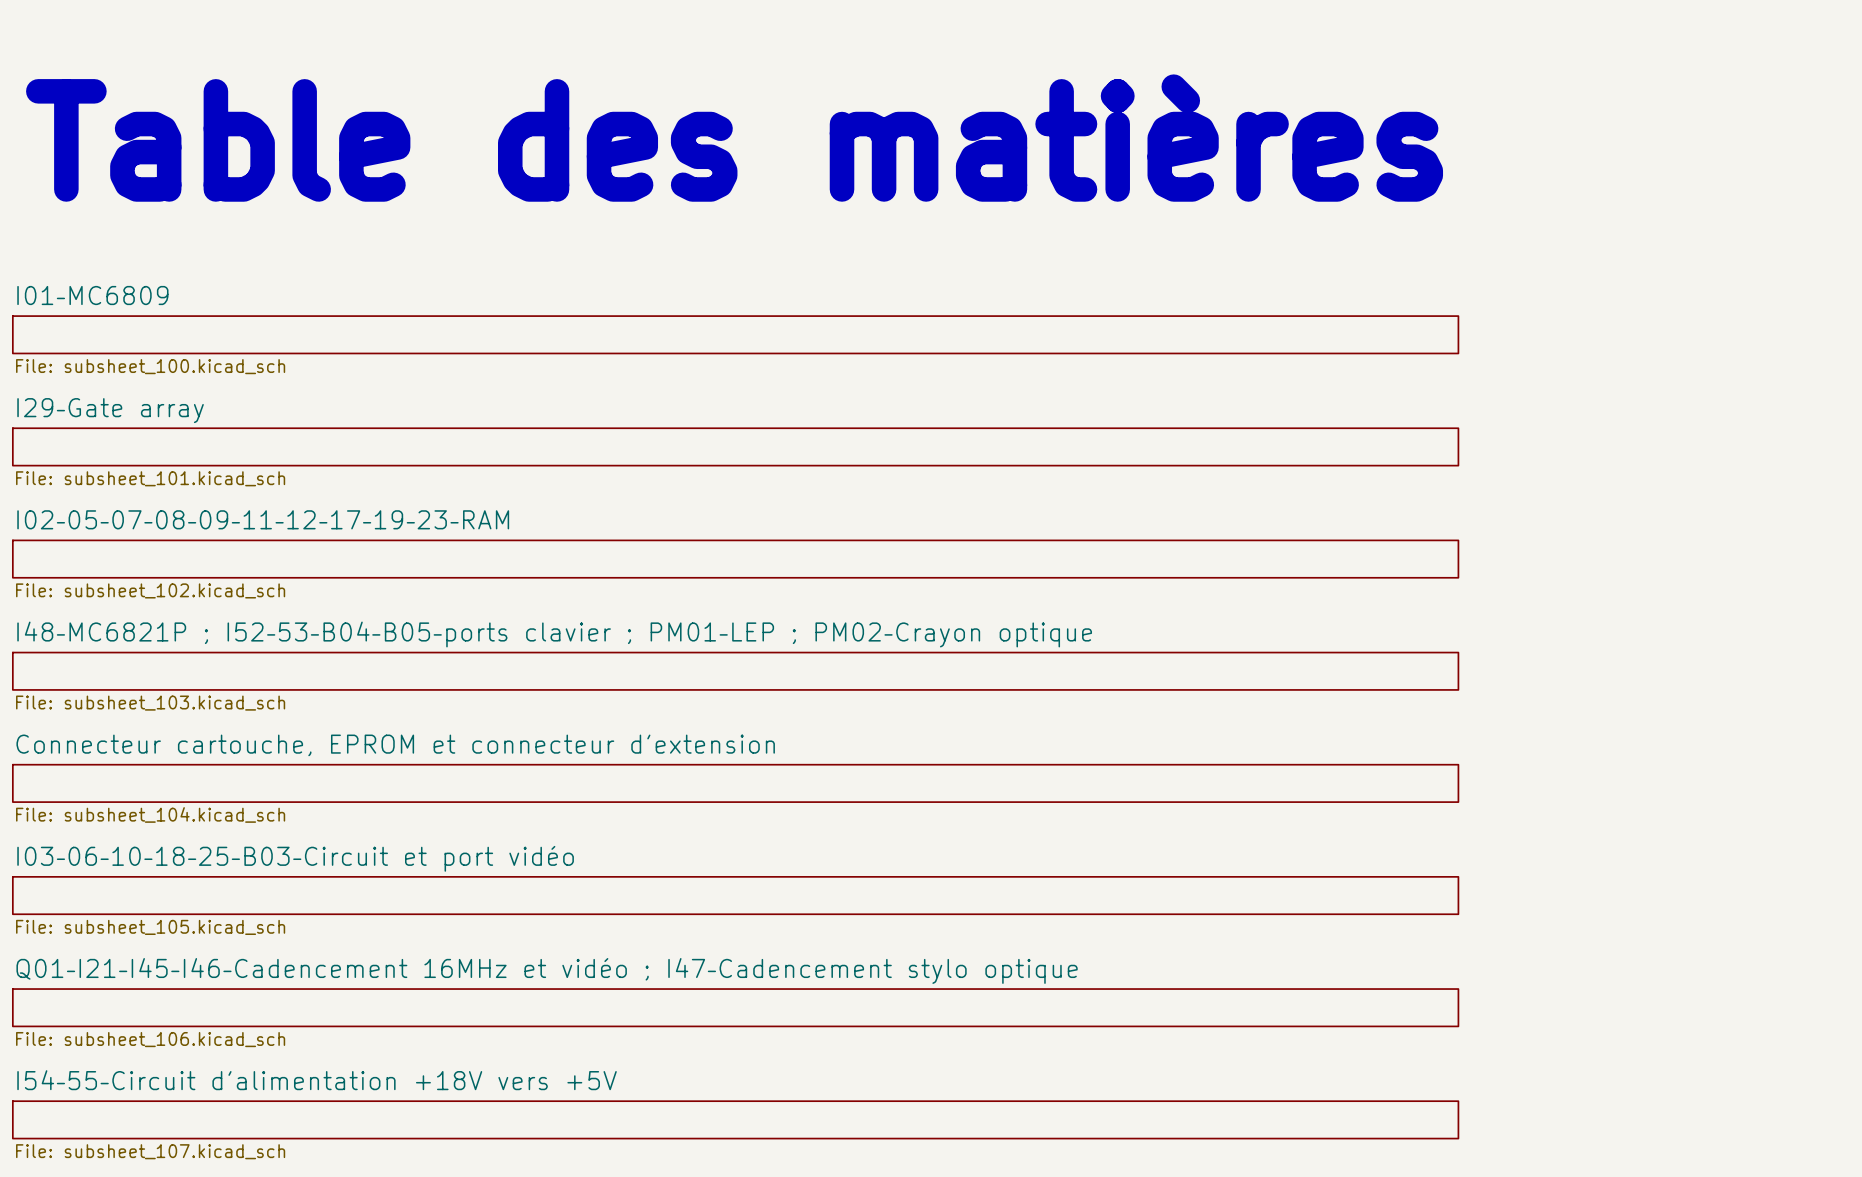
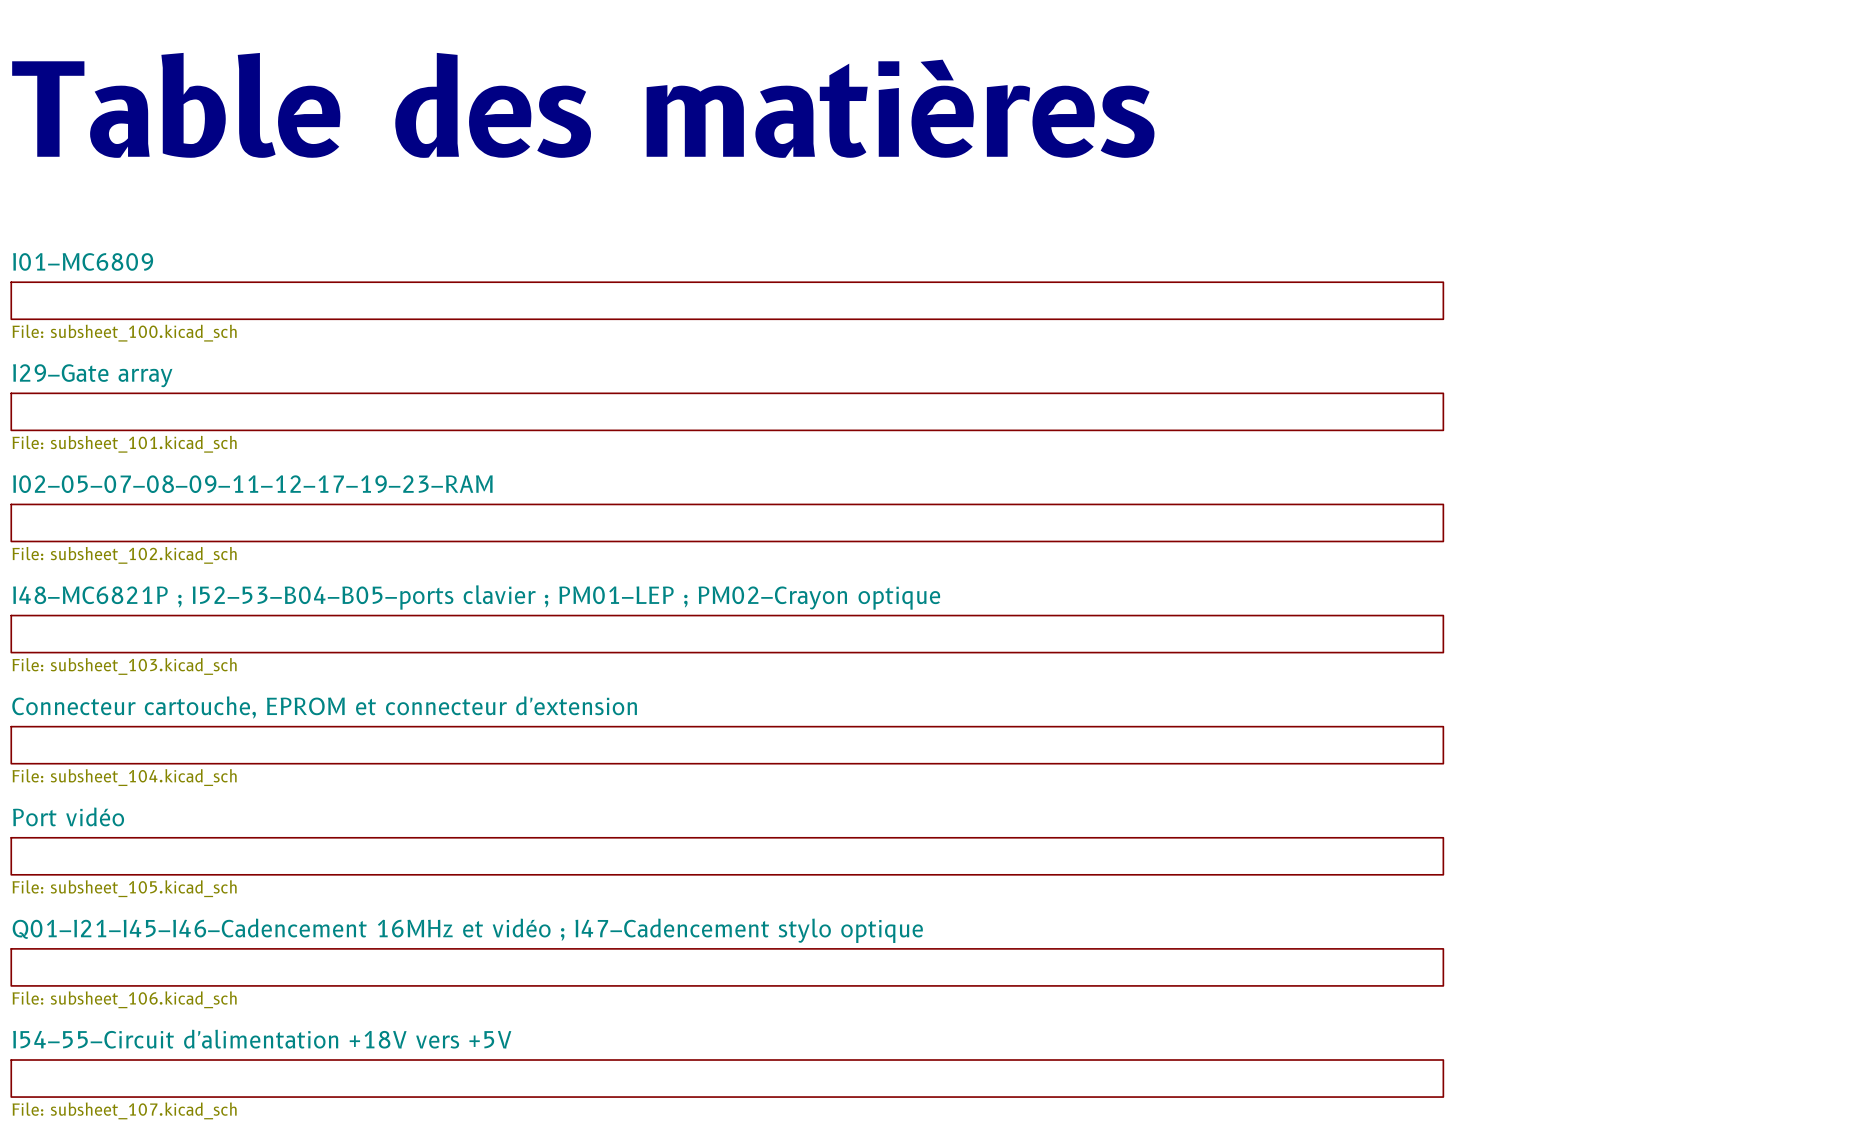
sheet Port vidéo name: I03–06–10–18–25–B03–Circuit et port vidéo (295, 858) -> Port vidéo (68, 816)

